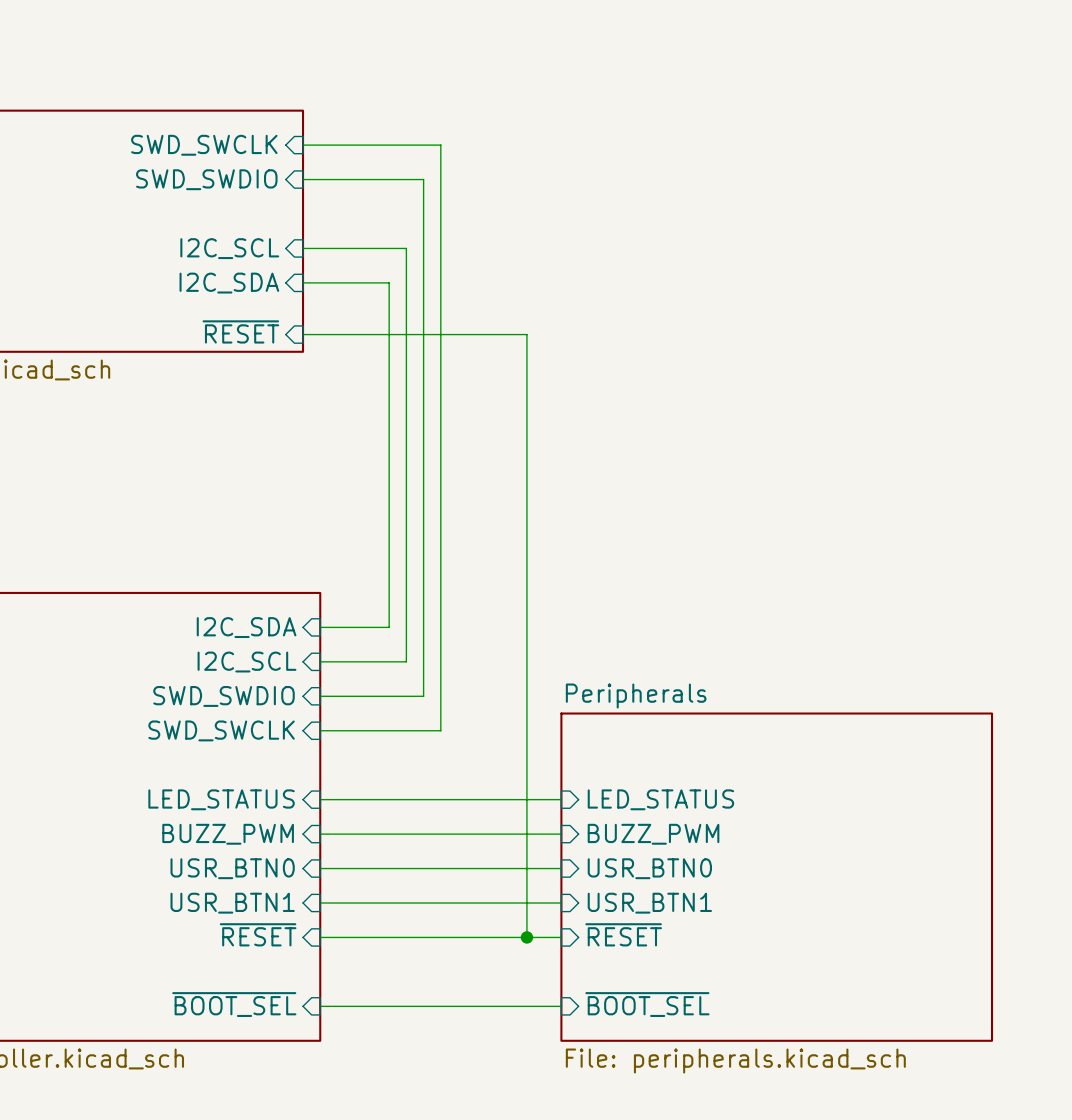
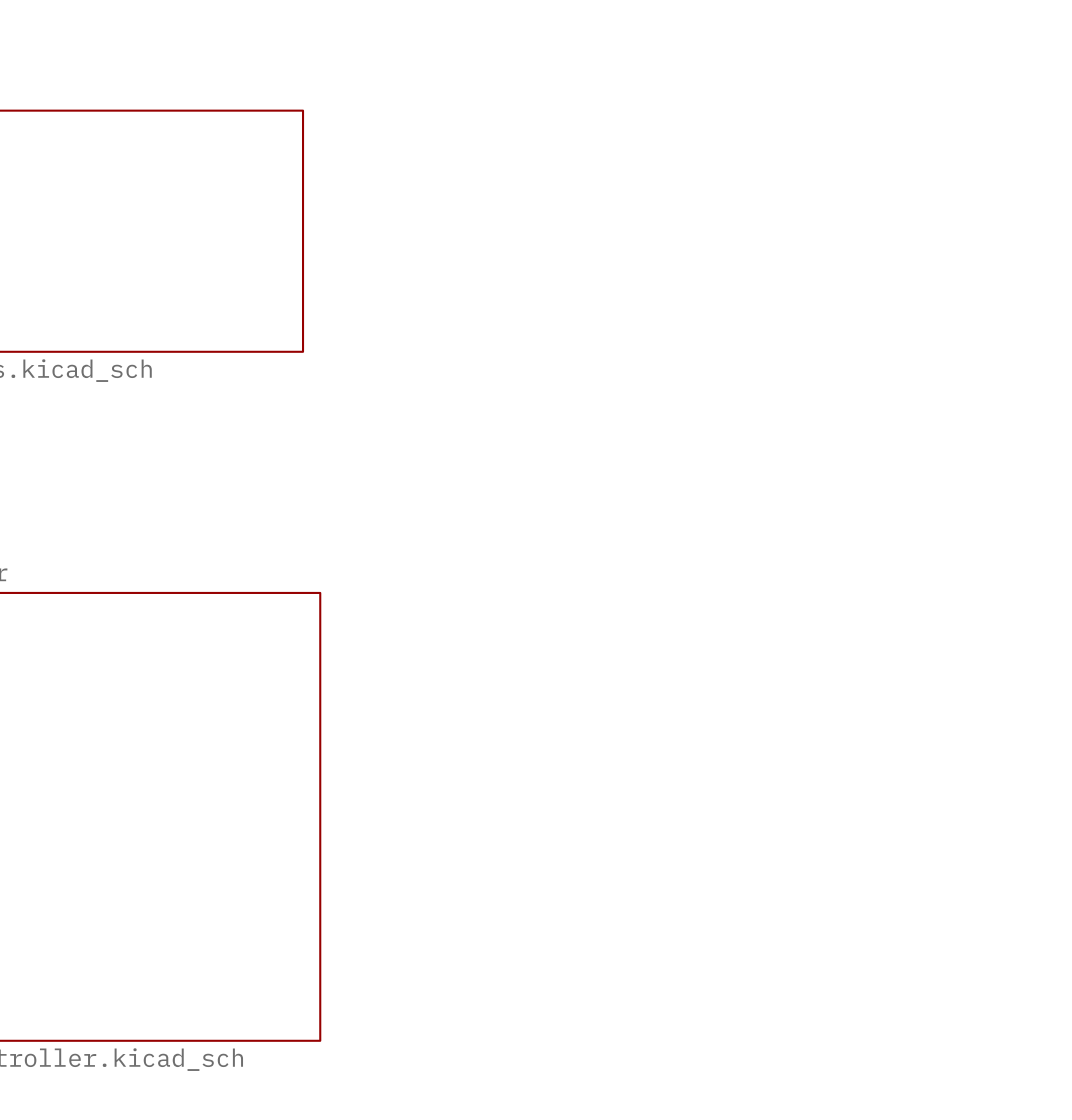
sheet pin: SWD_SWCLK (204, 145) -> none
wire: (303, 145) (440, 145) (440, 730) (320, 730) -> none
sheet pin: SWD_SWDIO (206, 179) -> none
wire: (303, 179) (423, 179) (423, 696) (320, 696) -> none
sheet pin: I2C_SCL (229, 248) -> none
wire: (303, 248) (406, 248) (406, 661) (320, 661) -> none
wire: (303, 282) (389, 282) (389, 627) (320, 627) -> none
sheet pin: I2C_SDA (229, 283) -> none
sheet pin: ~{RESET} (240, 331) -> none
wire: (303, 334) (526, 334) (526, 937) -> none
sheet pin: I2C_SDA (246, 627) -> none
sheet pin: I2C_SCL (246, 662) -> none
sheet pin: SWD_SWDIO (224, 696) -> none
sheet pin: SWD_SWCLK (221, 730) -> none
sheet pin: LED_STATUS (221, 799) -> none
wire: (320, 799) (561, 799) -> none
sheet pin: LED_STATUS (660, 799) -> none
sheet pin: BUZZ_PWM (228, 834) -> none
wire: (320, 834) (561, 834) -> none
sheet pin: BUZZ_PWM (653, 834) -> none
sheet pin: USR_BTN0 (232, 868) -> none
wire: (320, 868) (561, 868) -> none
sheet pin: USR_BTN0 (649, 868) -> none
sheet Peripherals: File: peripherals.kicad_sch (776, 877) -> none
wire: (320, 902) (561, 902) -> none
sheet pin: USR_BTN1 (232, 903) -> none
sheet pin: USR_BTN1 (649, 903) -> none
sheet pin: ~{RESET} (258, 934) -> none
sheet pin: ~{RESET} (623, 934) -> none
wire: (320, 937) (561, 937) -> none
junction: (526, 937) -> none
sheet pin: ~{BOOT_SEL} (234, 1004) -> none
sheet pin: ~{BOOT_SEL} (647, 1004) -> none
wire: (320, 1006) (561, 1006) -> none

